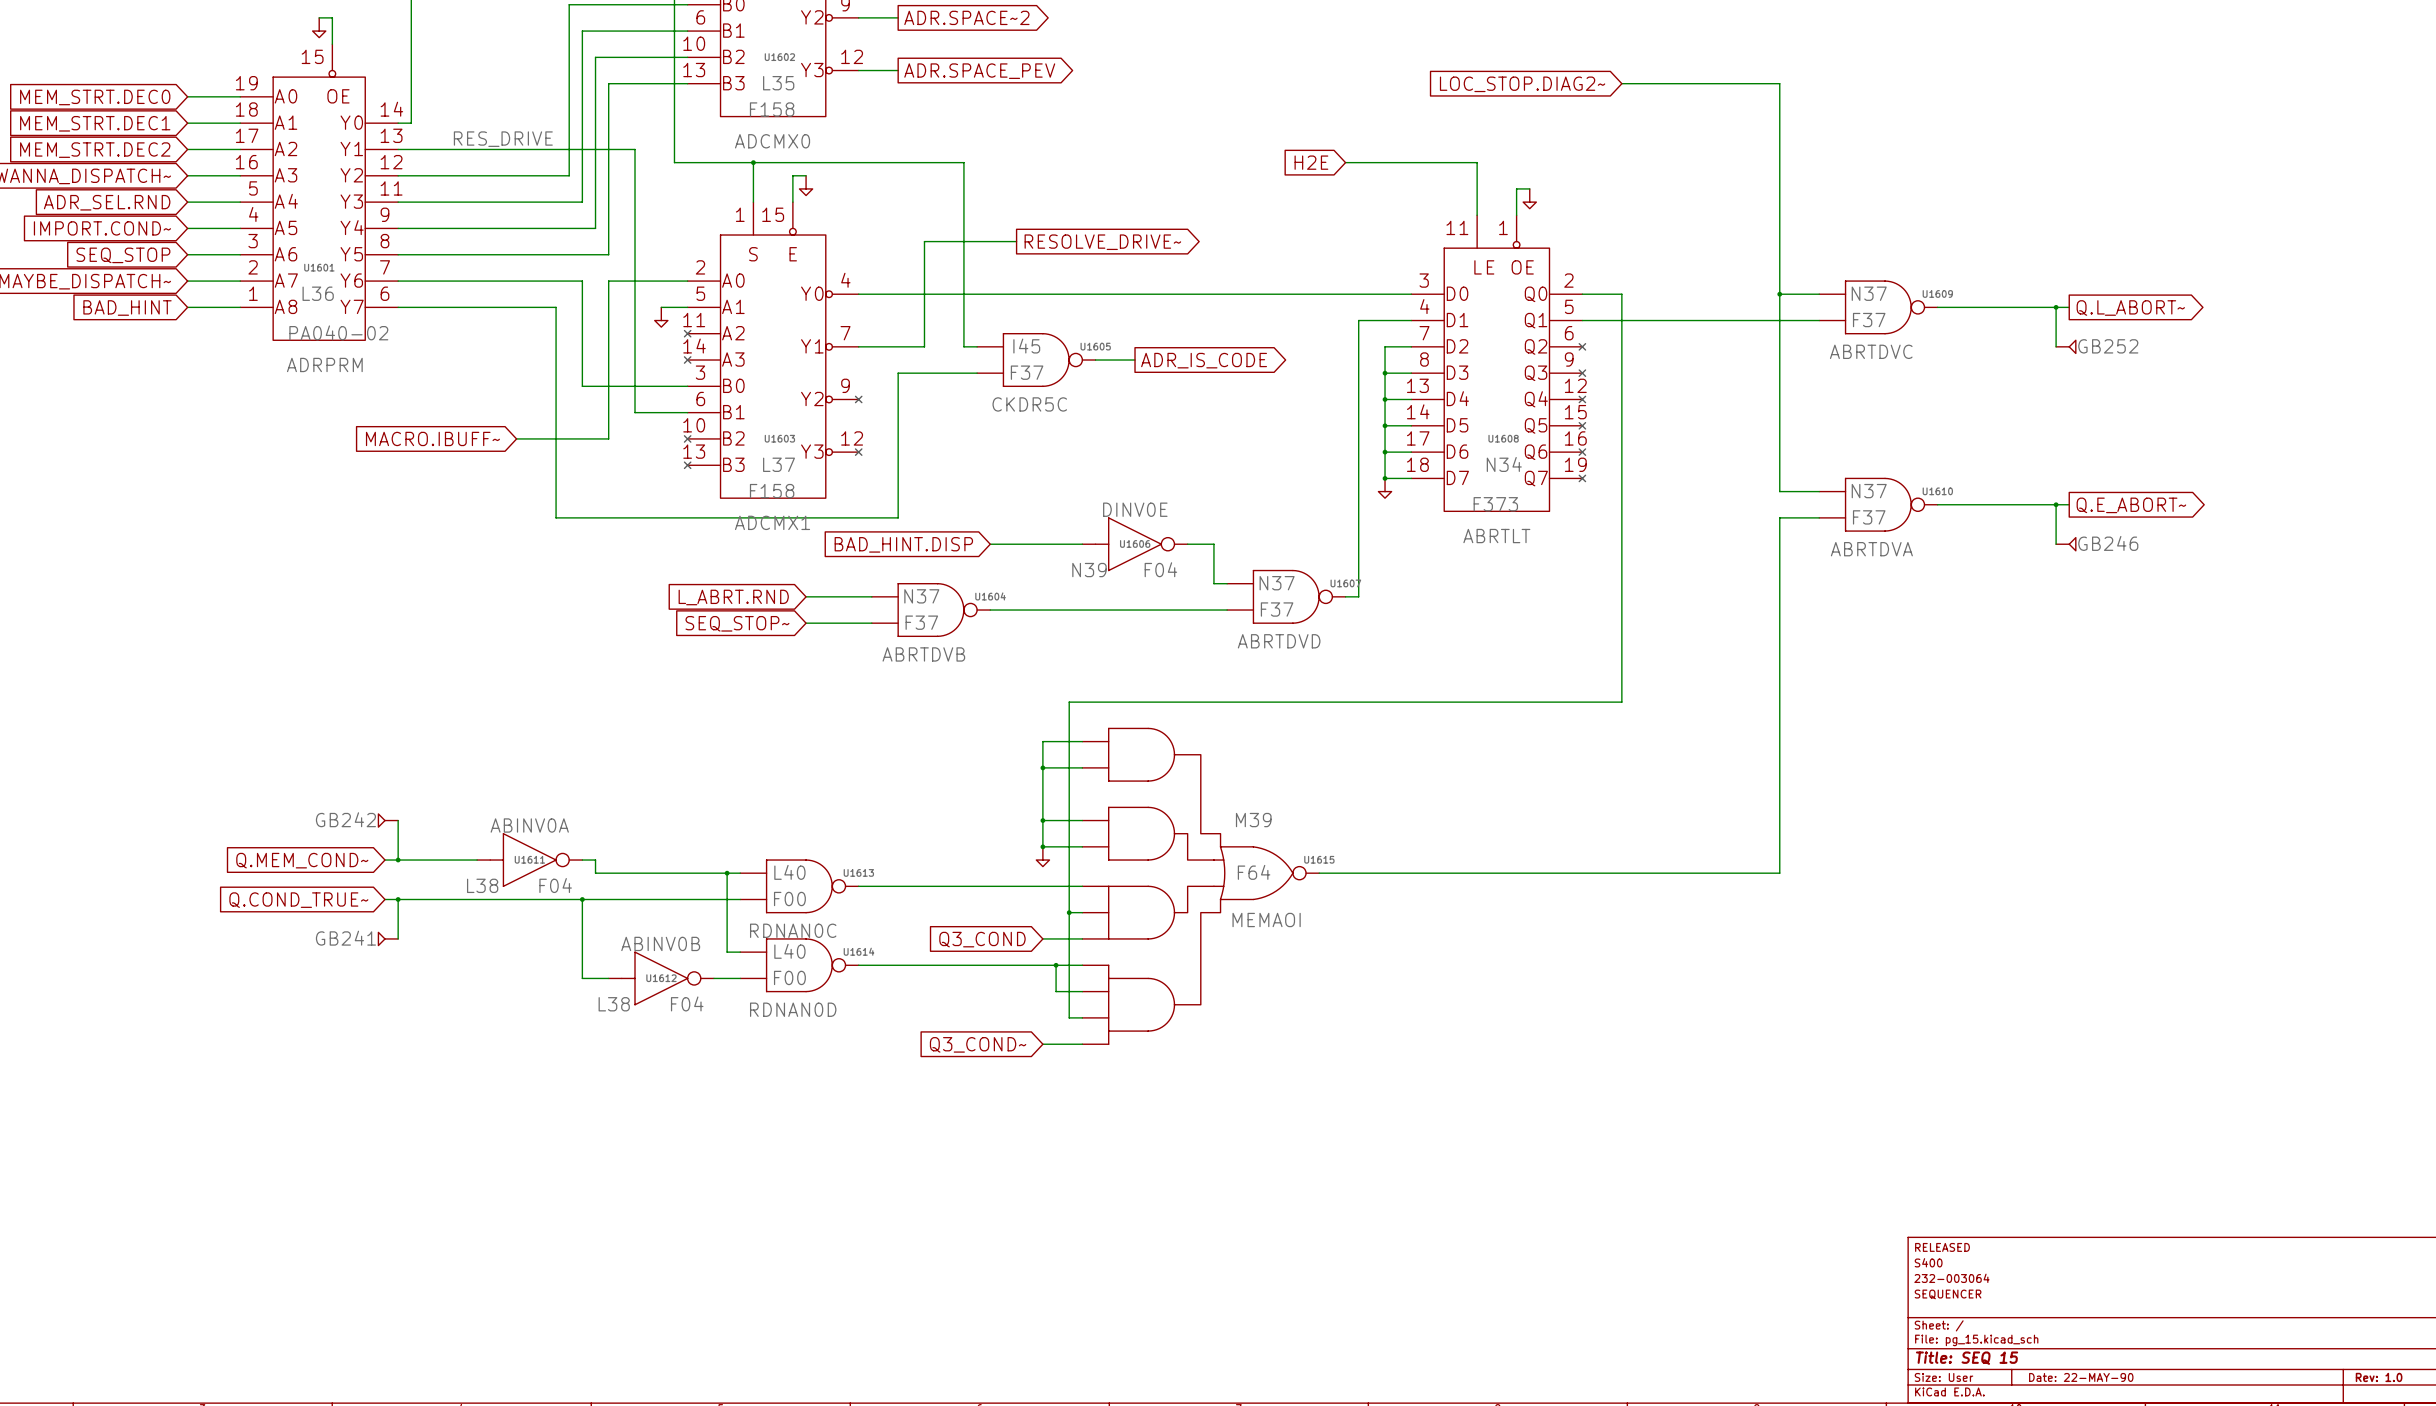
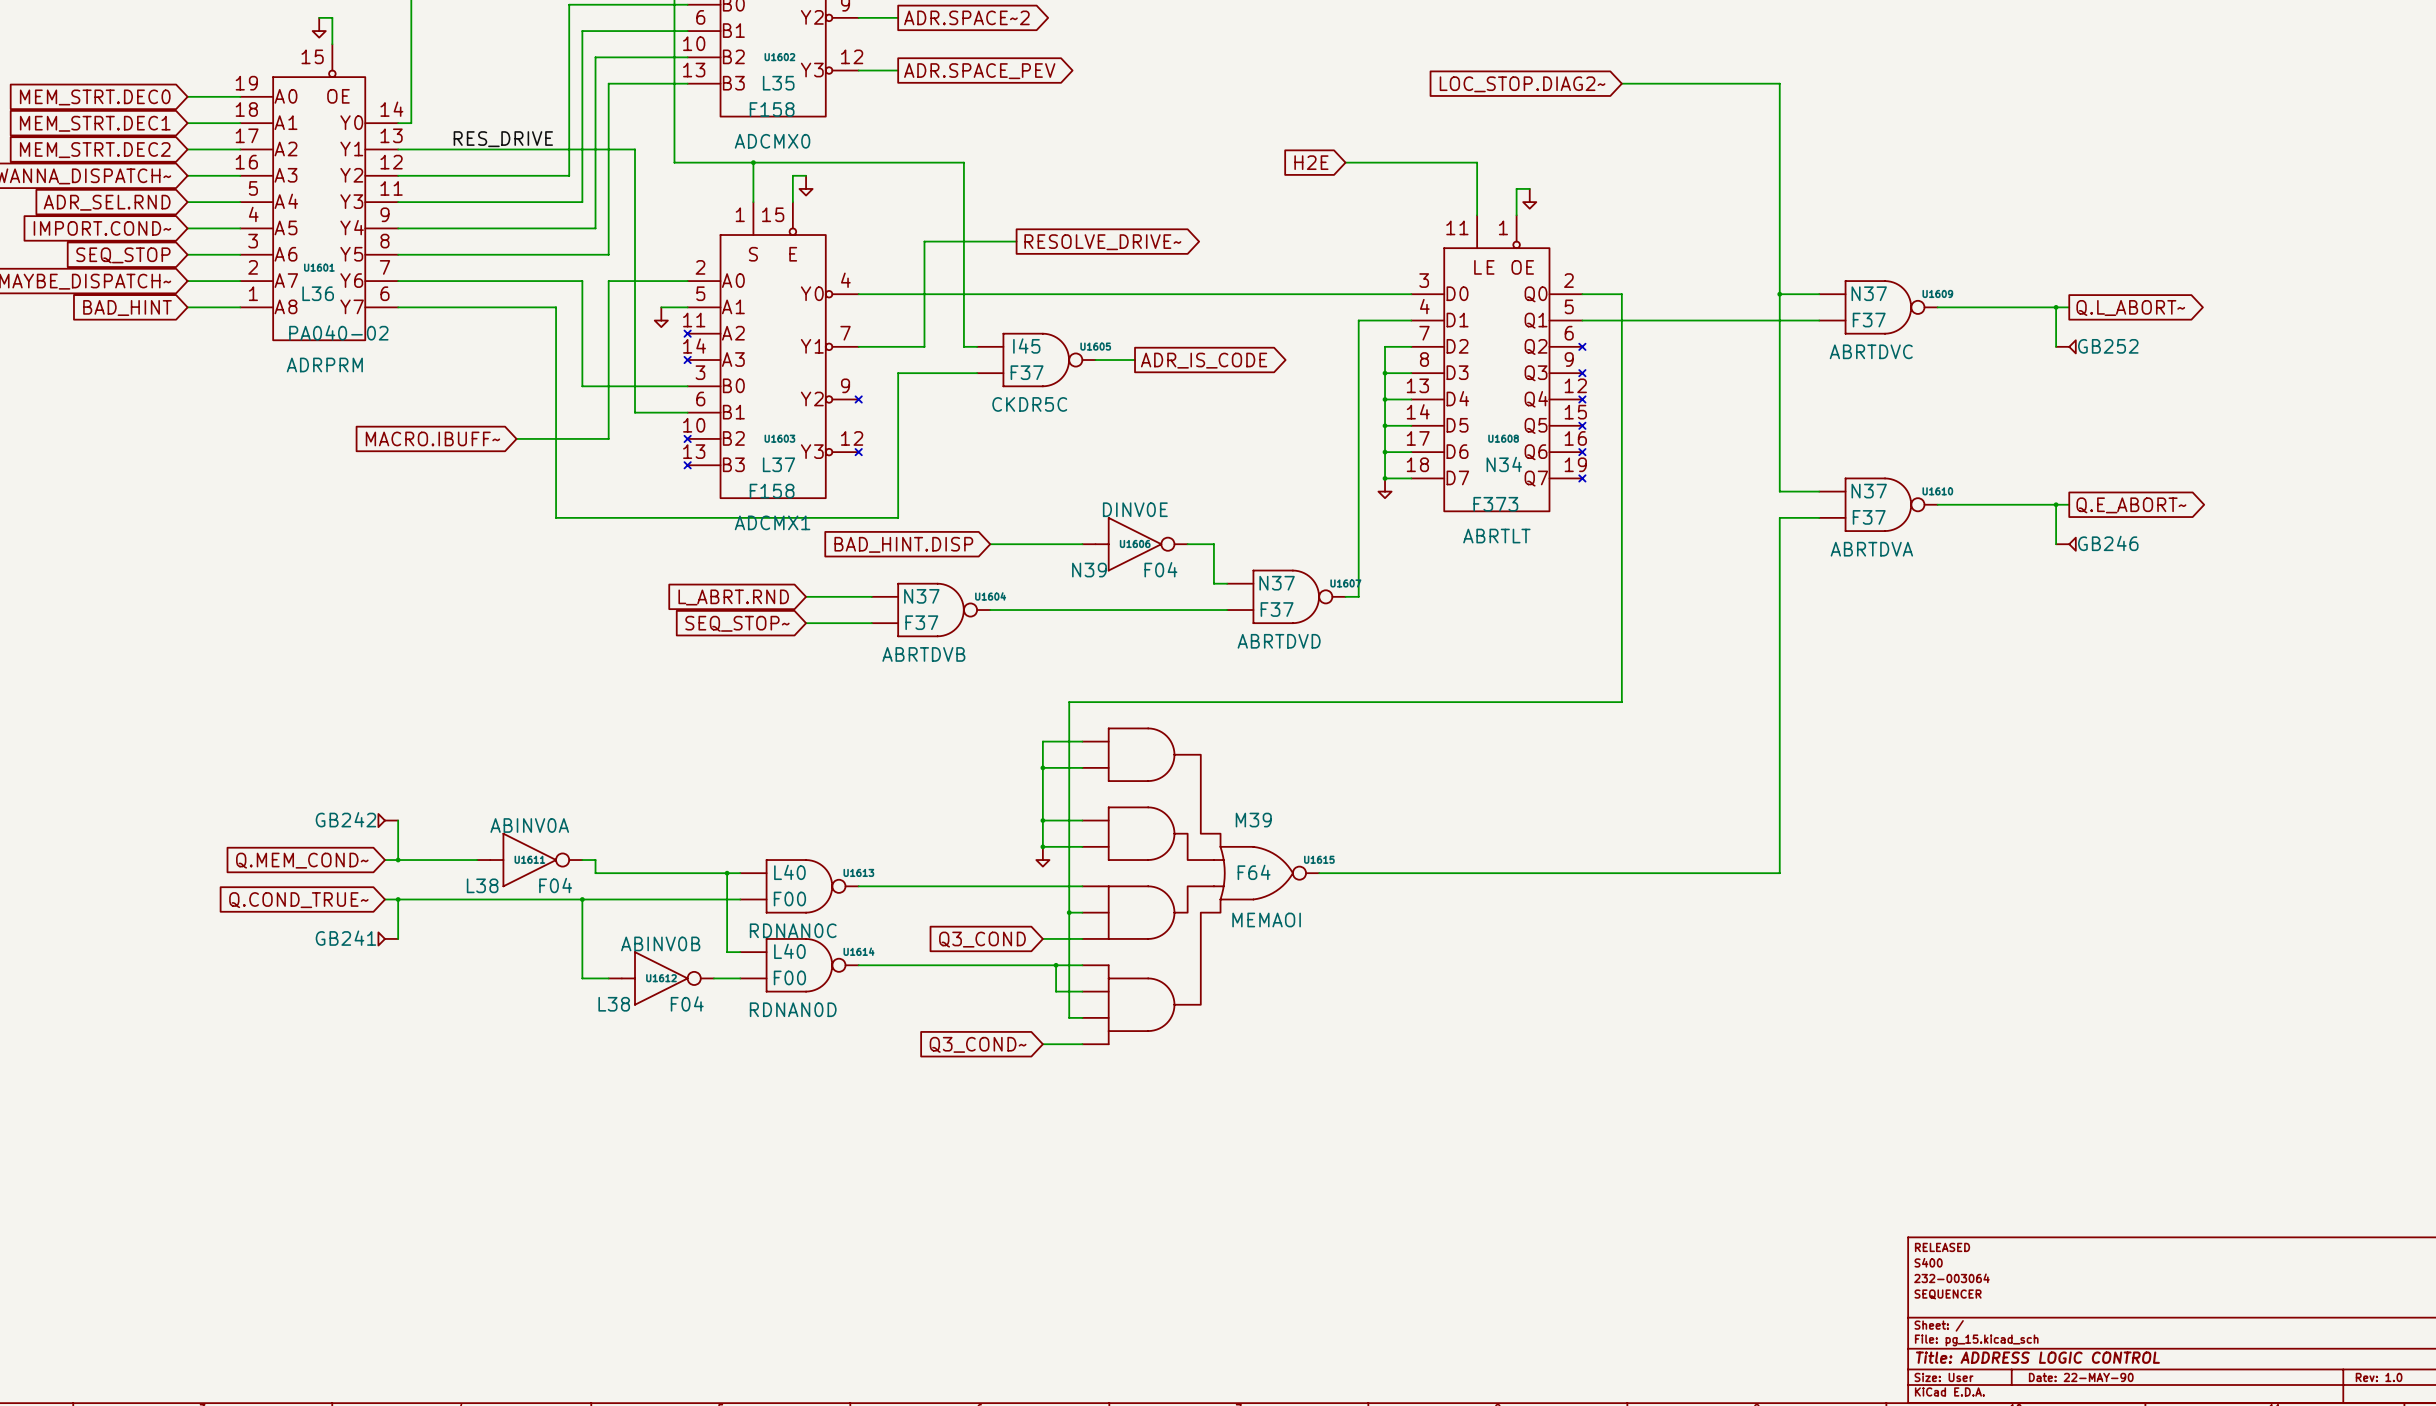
title block: Title: SEQ 15 (1967, 1358) -> Title: ADDRESS LOGIC CONTROL (2037, 1357)

